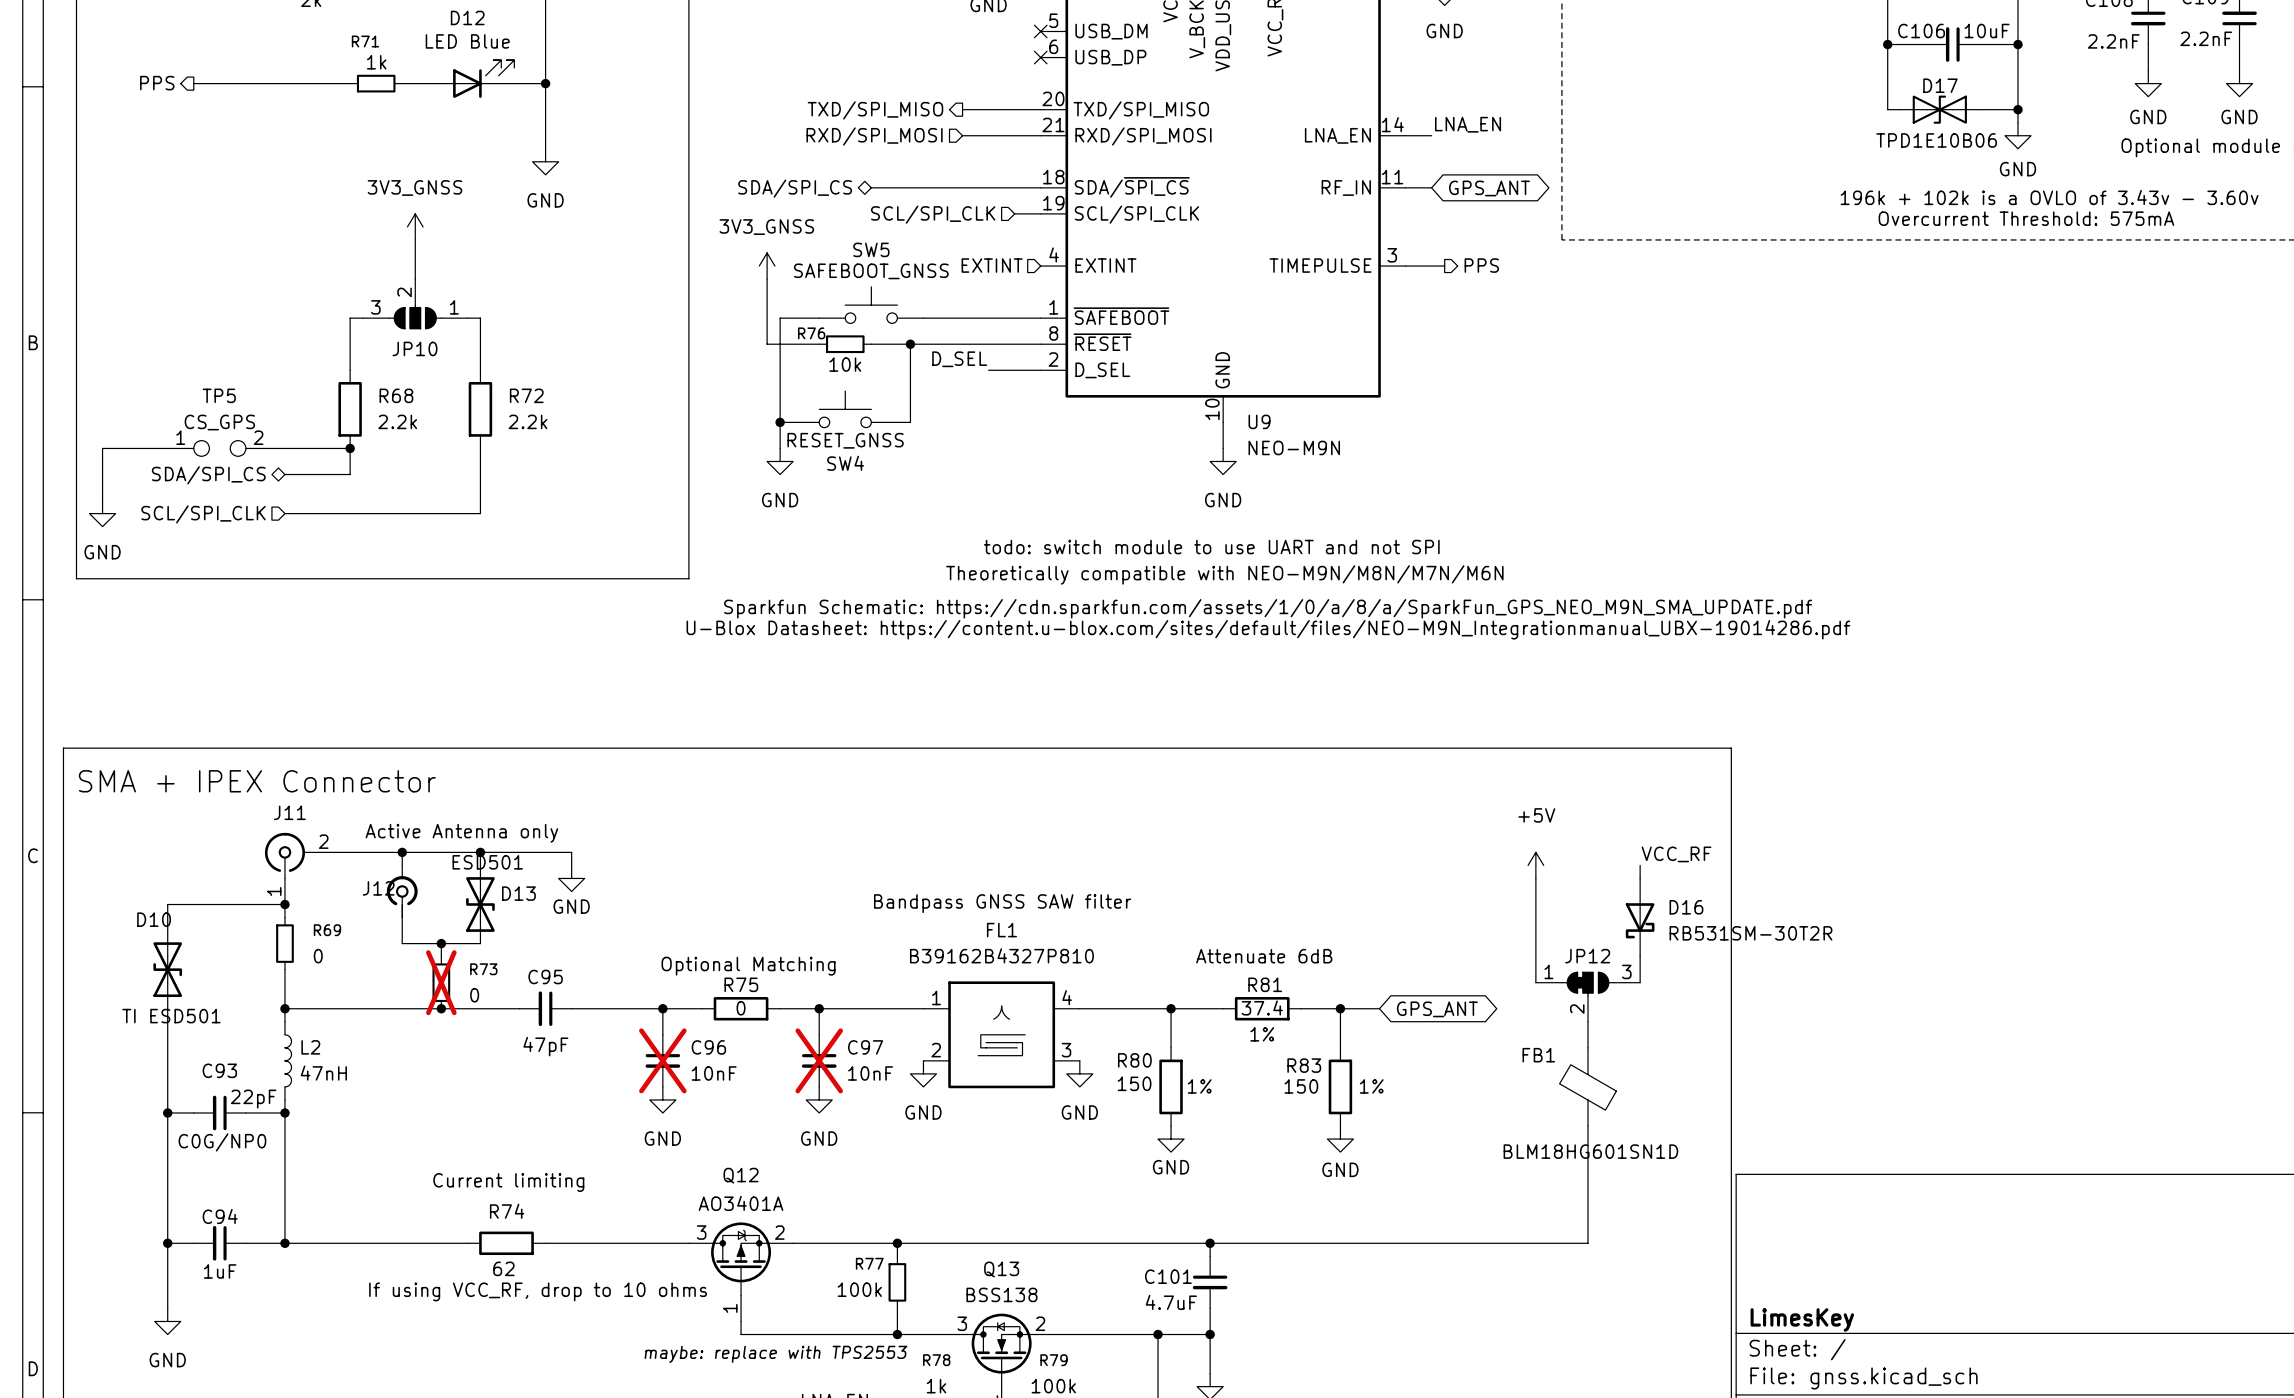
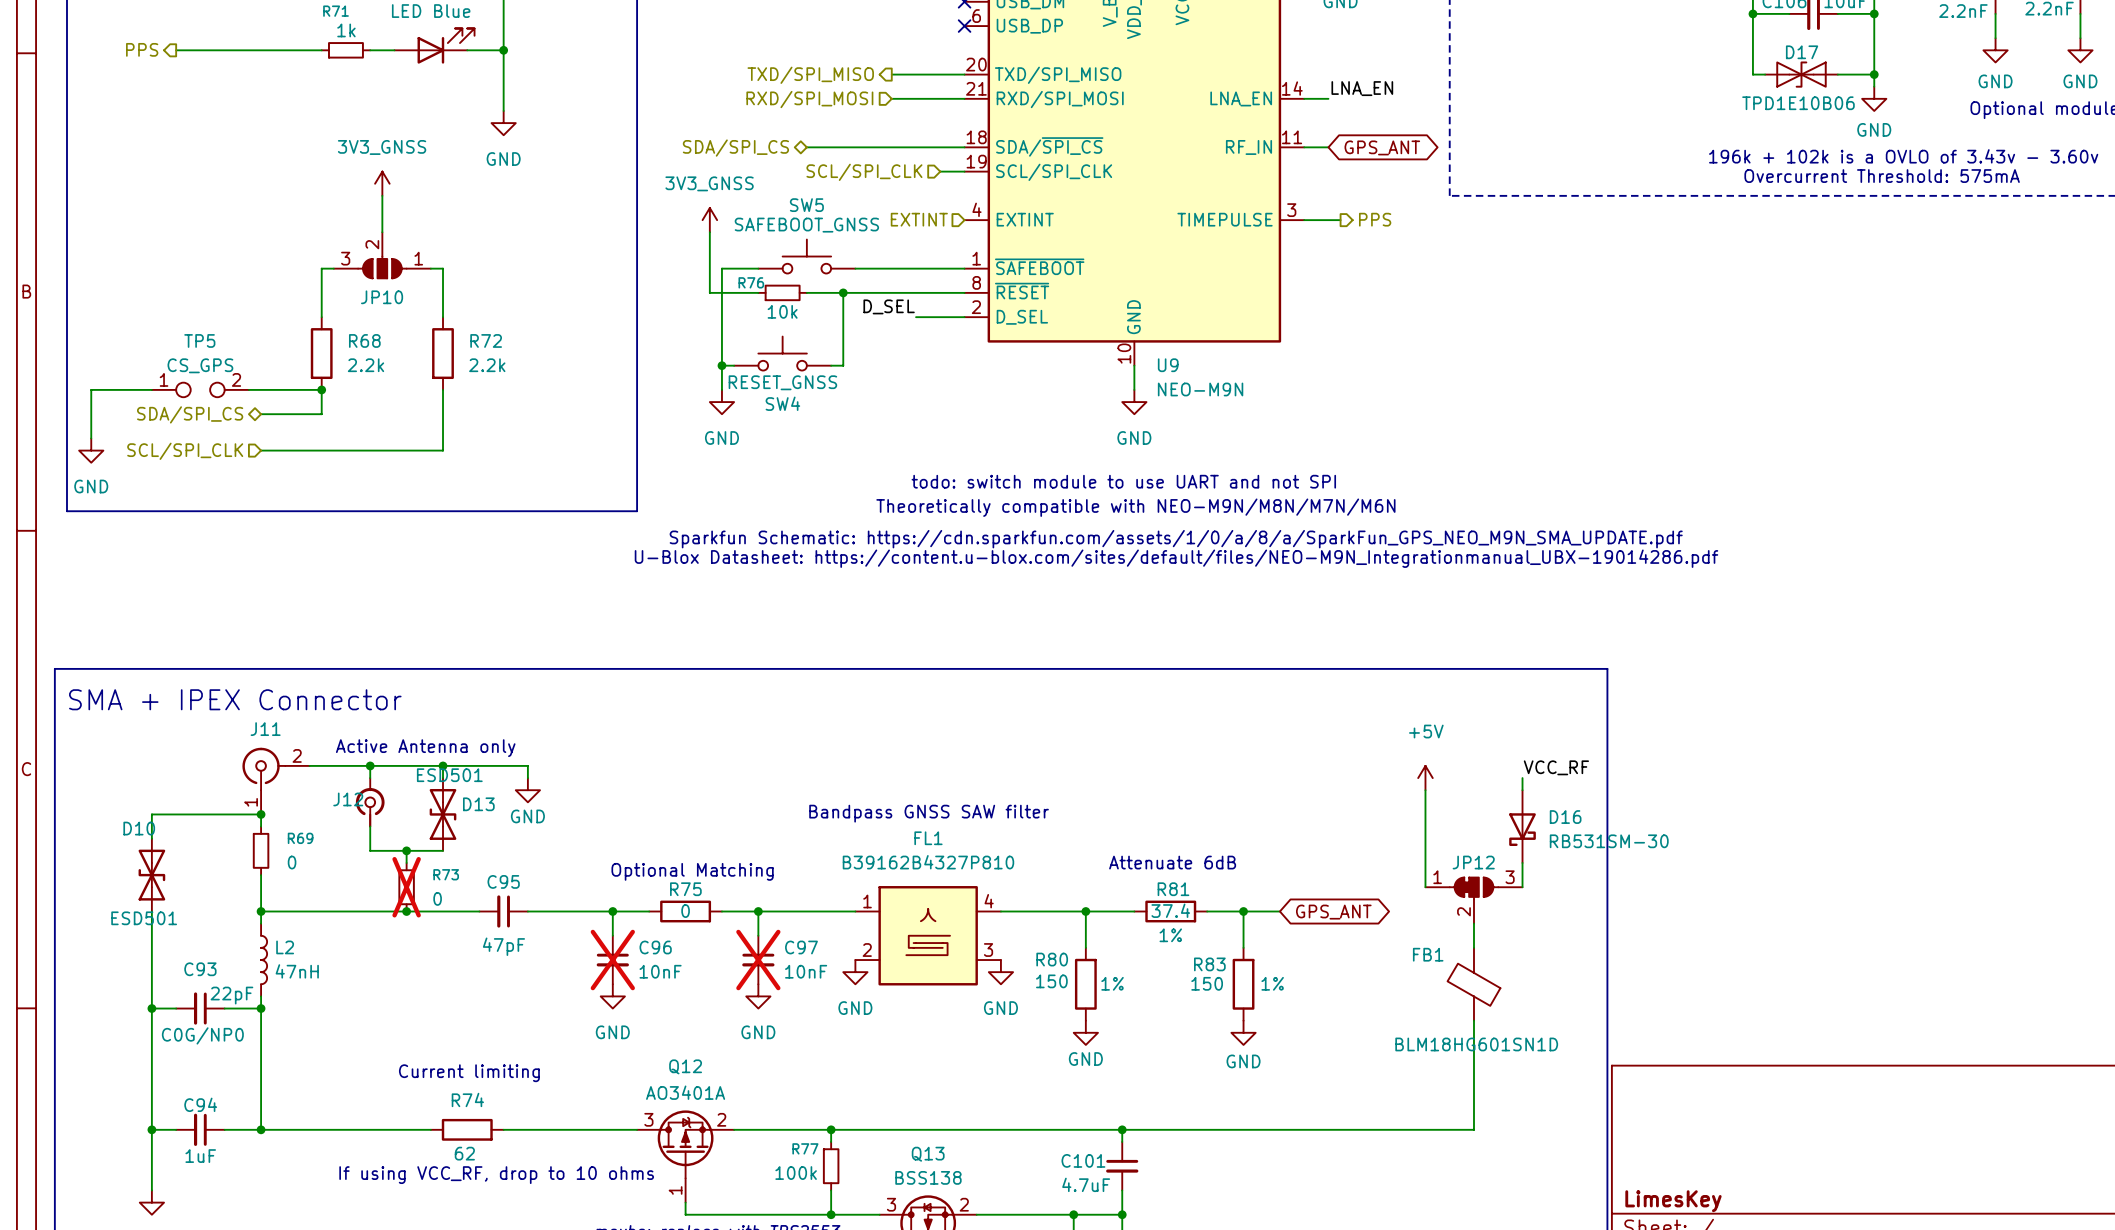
D16 value: RB531SM-30T2R (1750, 933) -> RB531SM-30 (1609, 841)
D10 value: TI ESD501 (171, 1016) -> ESD501 (144, 918)

